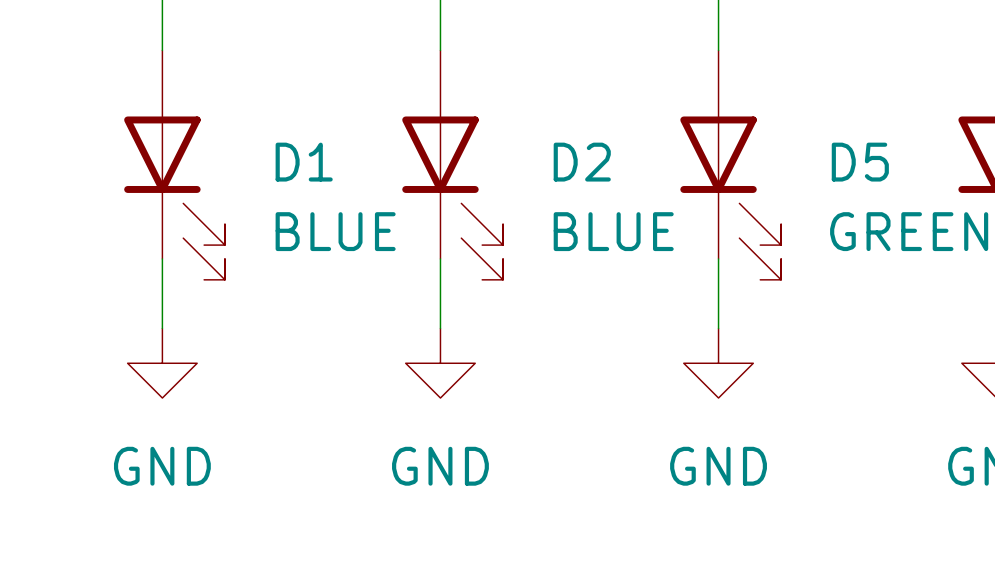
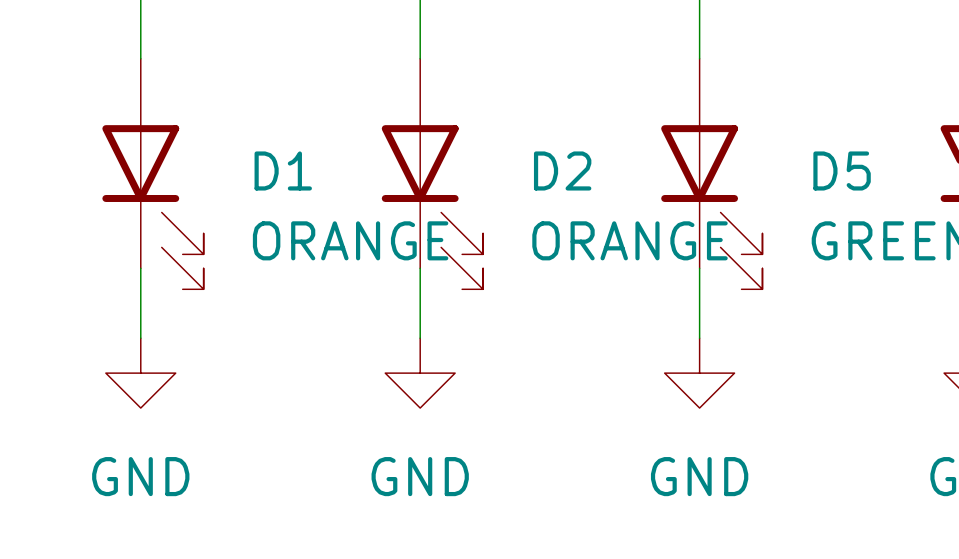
D1 value: BLUE (335, 231) -> ORANGE (350, 240)
D2 value: BLUE (613, 231) -> ORANGE (630, 240)

